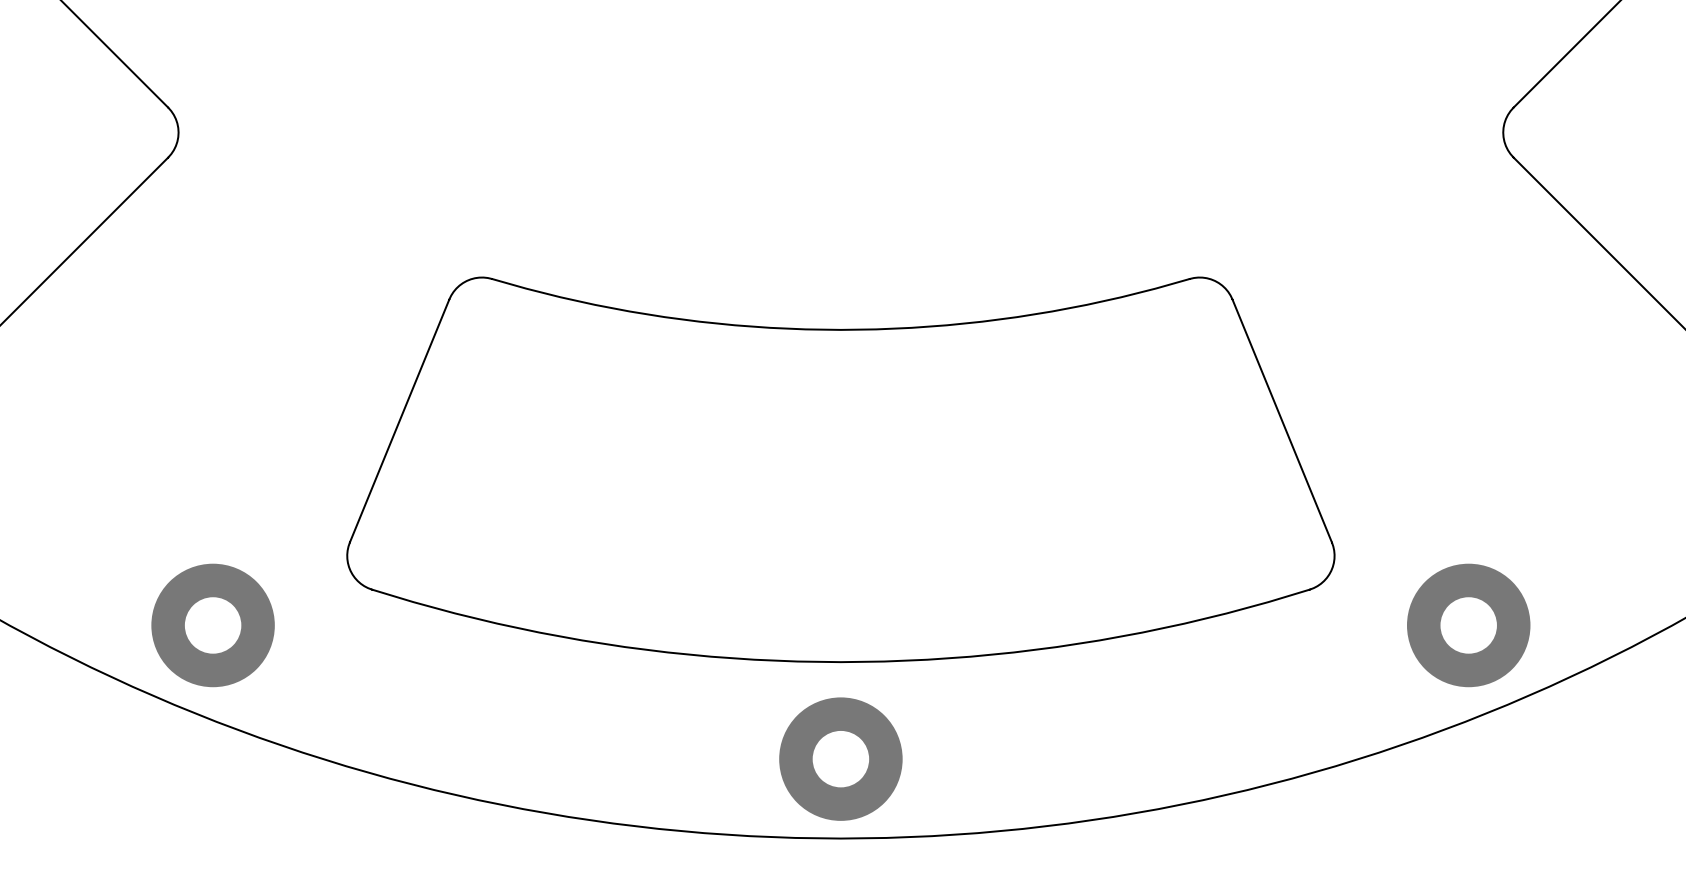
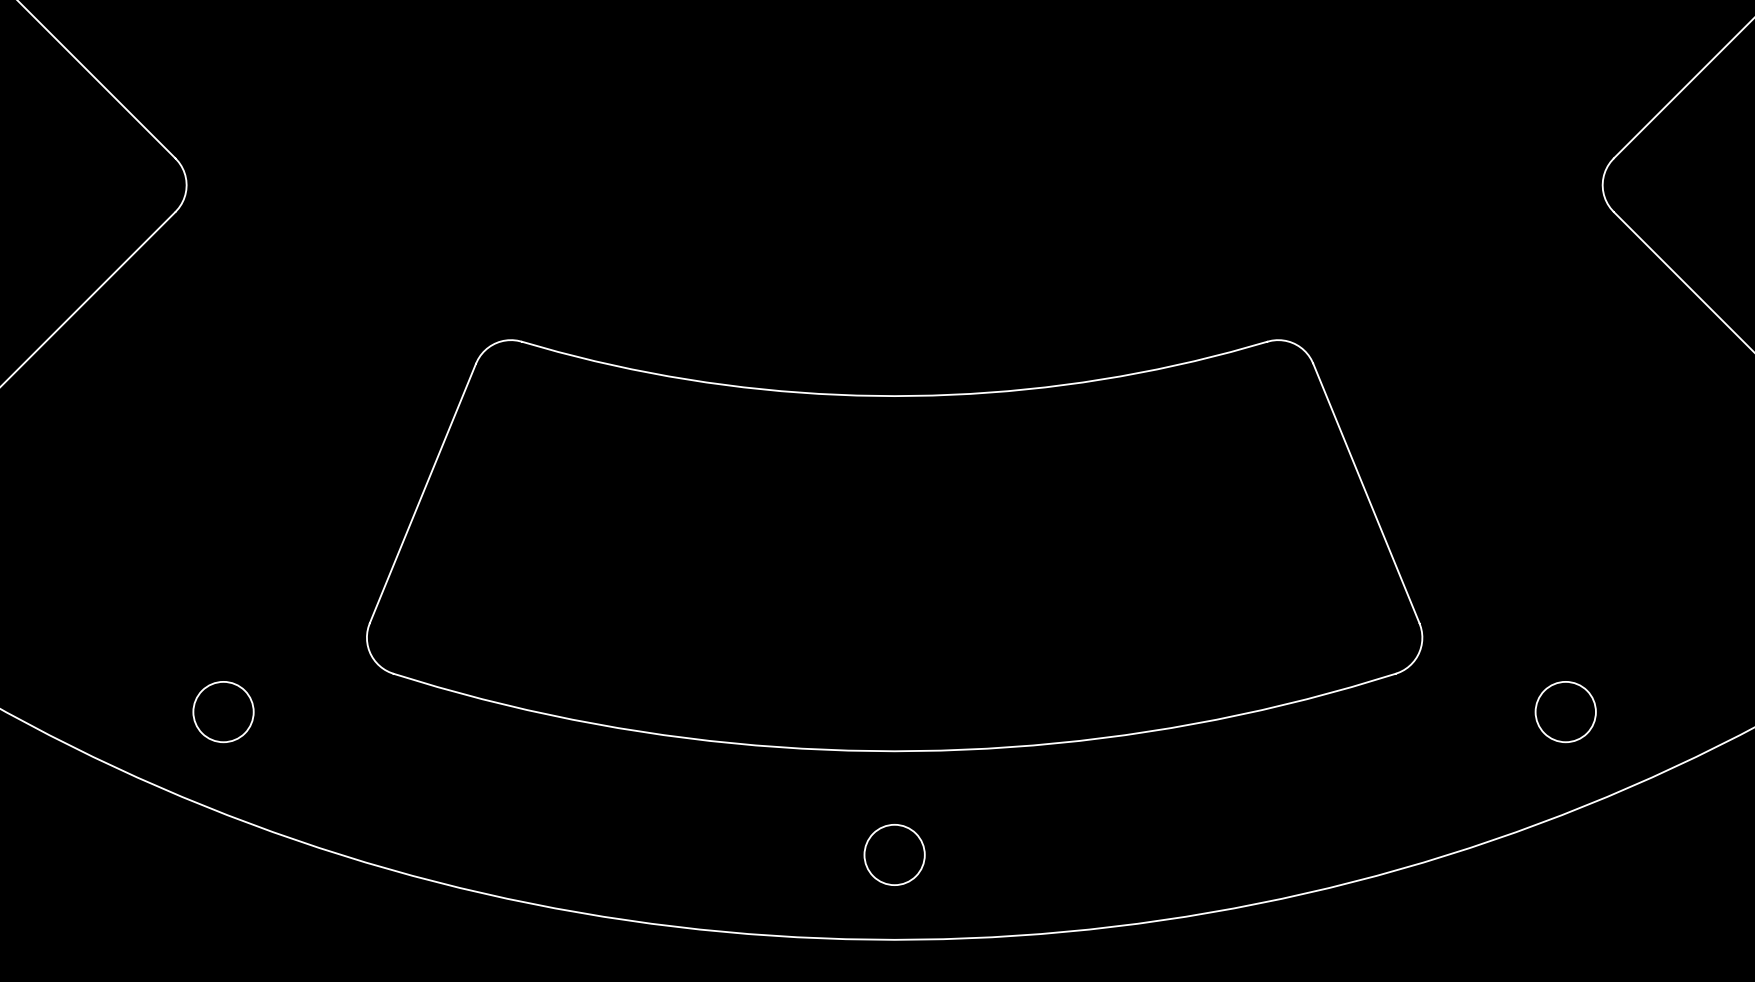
round board edge: none -> [193, 681, 254, 743]
round board edge: none -> [1535, 681, 1596, 743]
via: (213, 625) -> none
via: (1468, 625) -> none
round board edge: none -> [864, 824, 925, 886]
via: (840, 759) -> none

